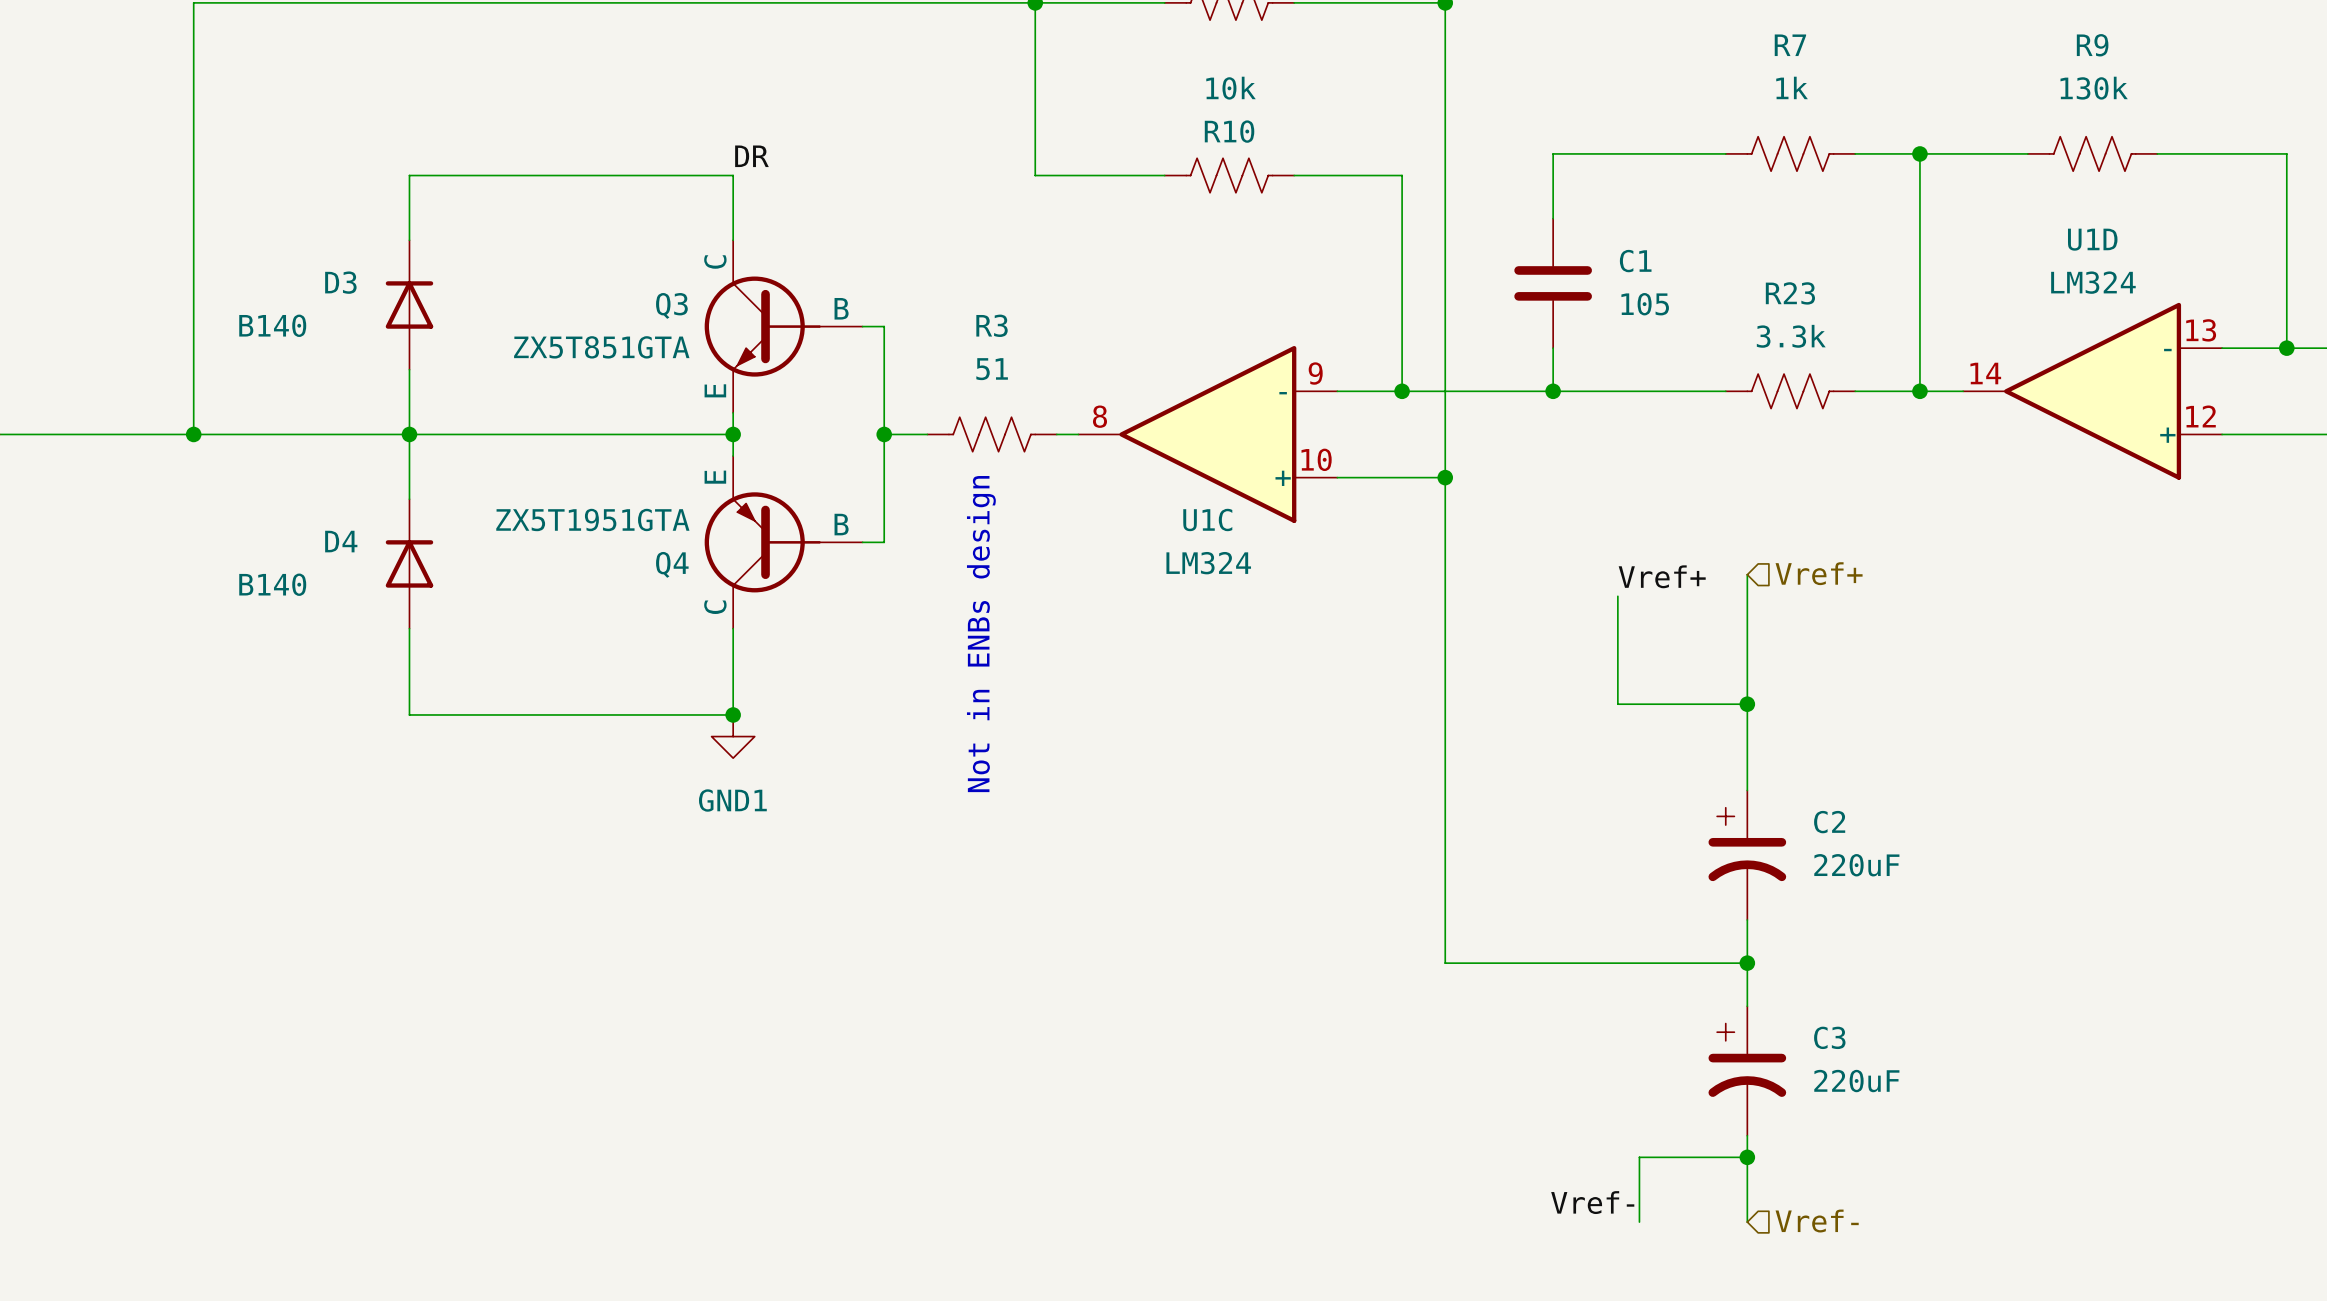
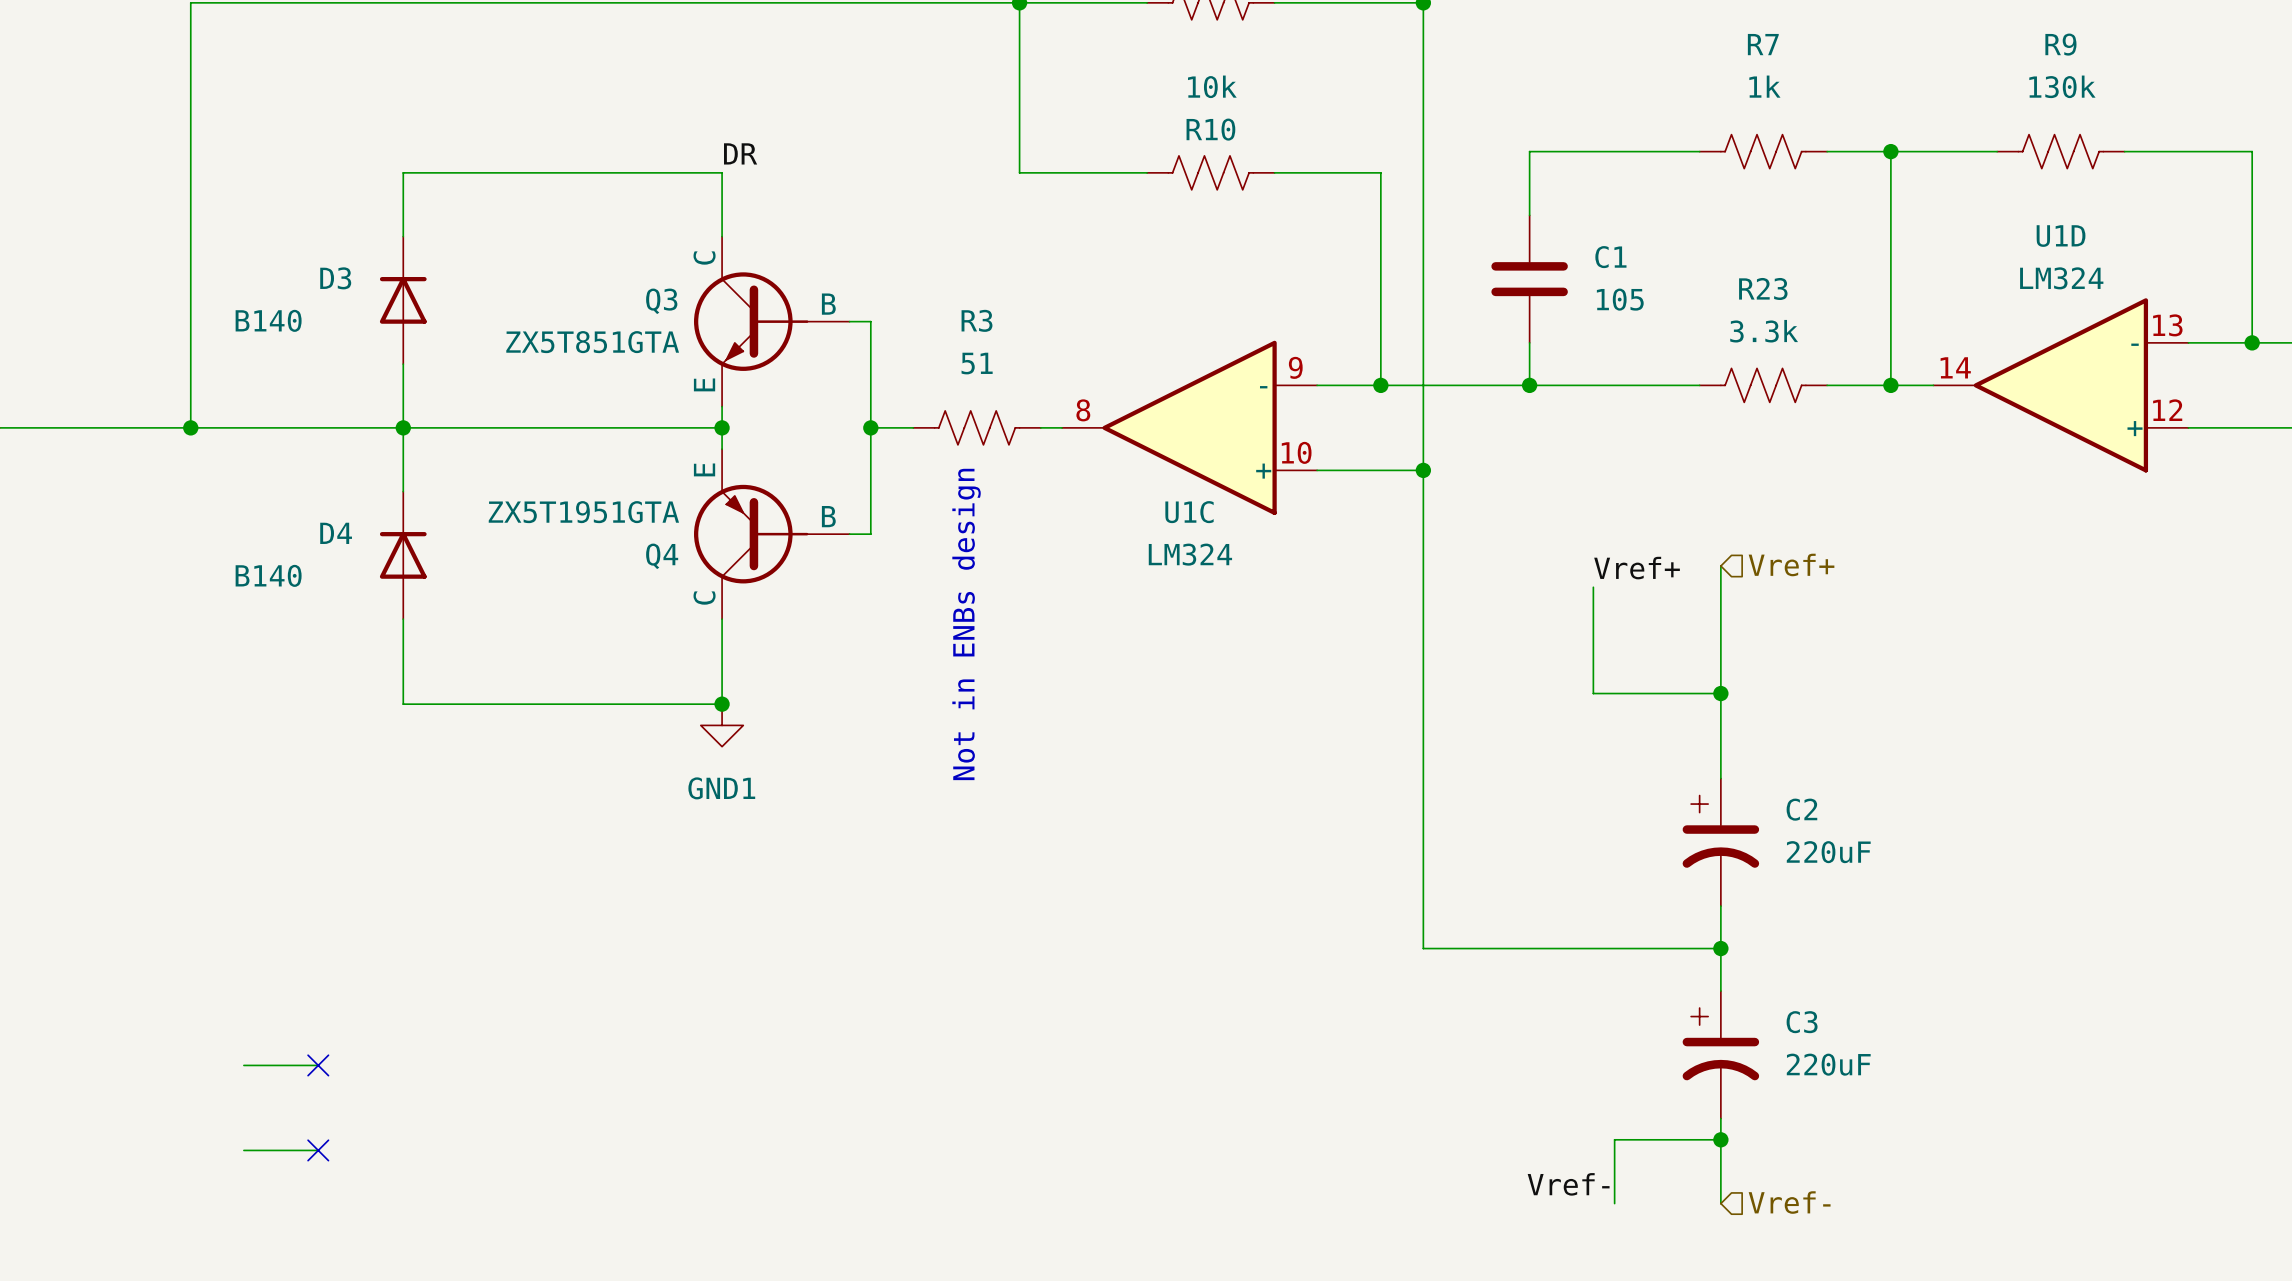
wire: none -> (243, 1065) (318, 1065)
no-connect mark: none -> (318, 1065)
wire: none -> (243, 1150) (318, 1150)
no-connect mark: none -> (318, 1150)

